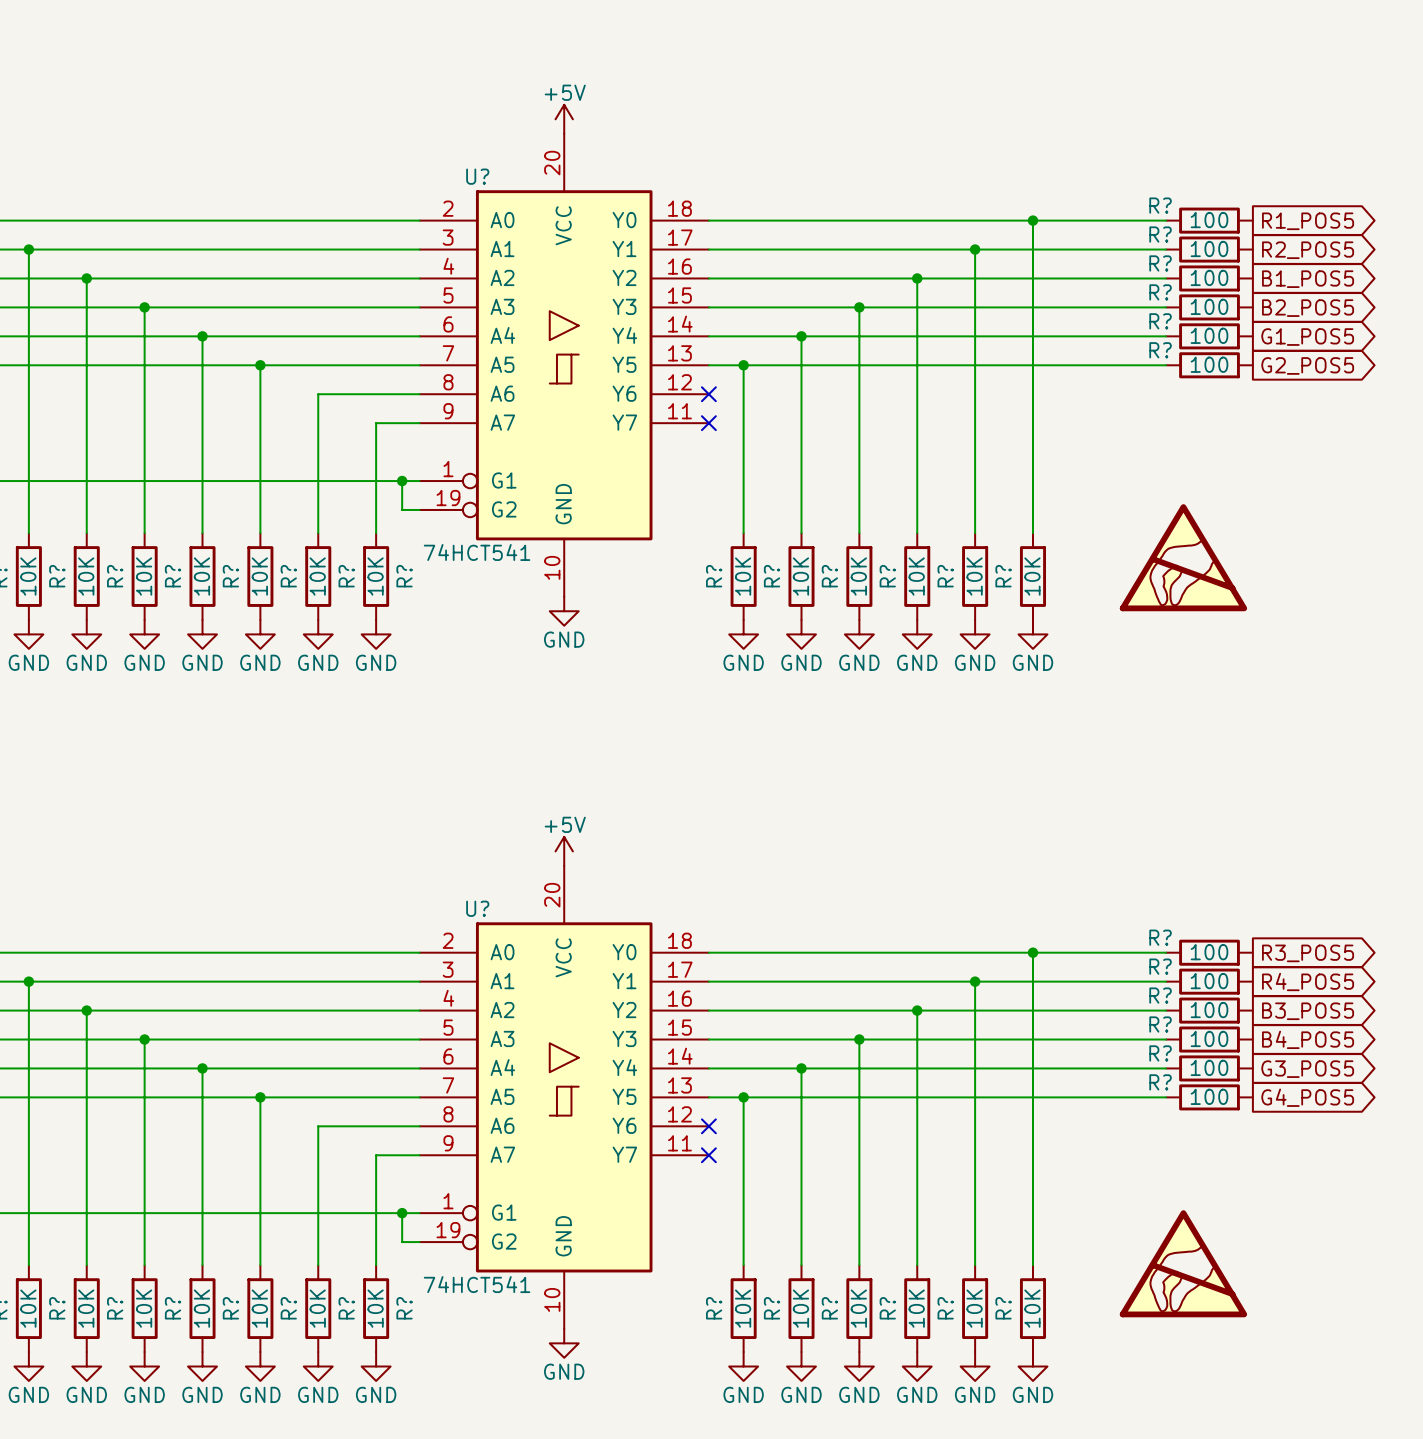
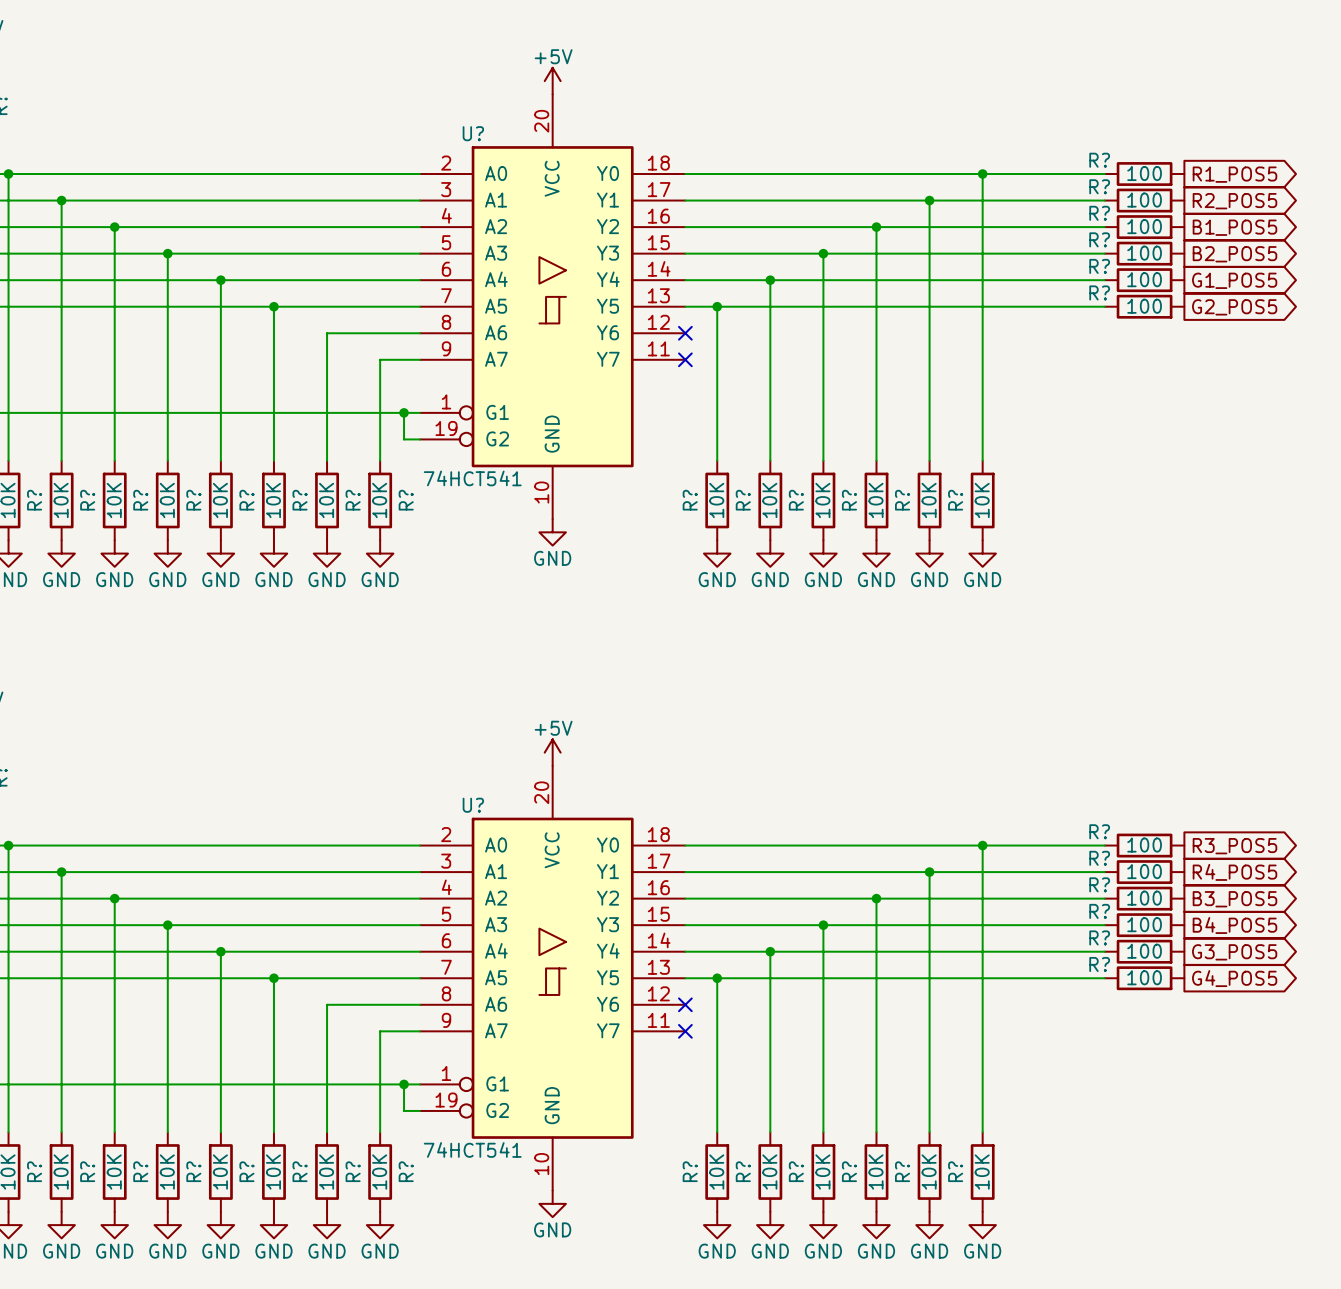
power symbol: (1183, 557) -> none
power symbol: (1183, 1263) -> none

